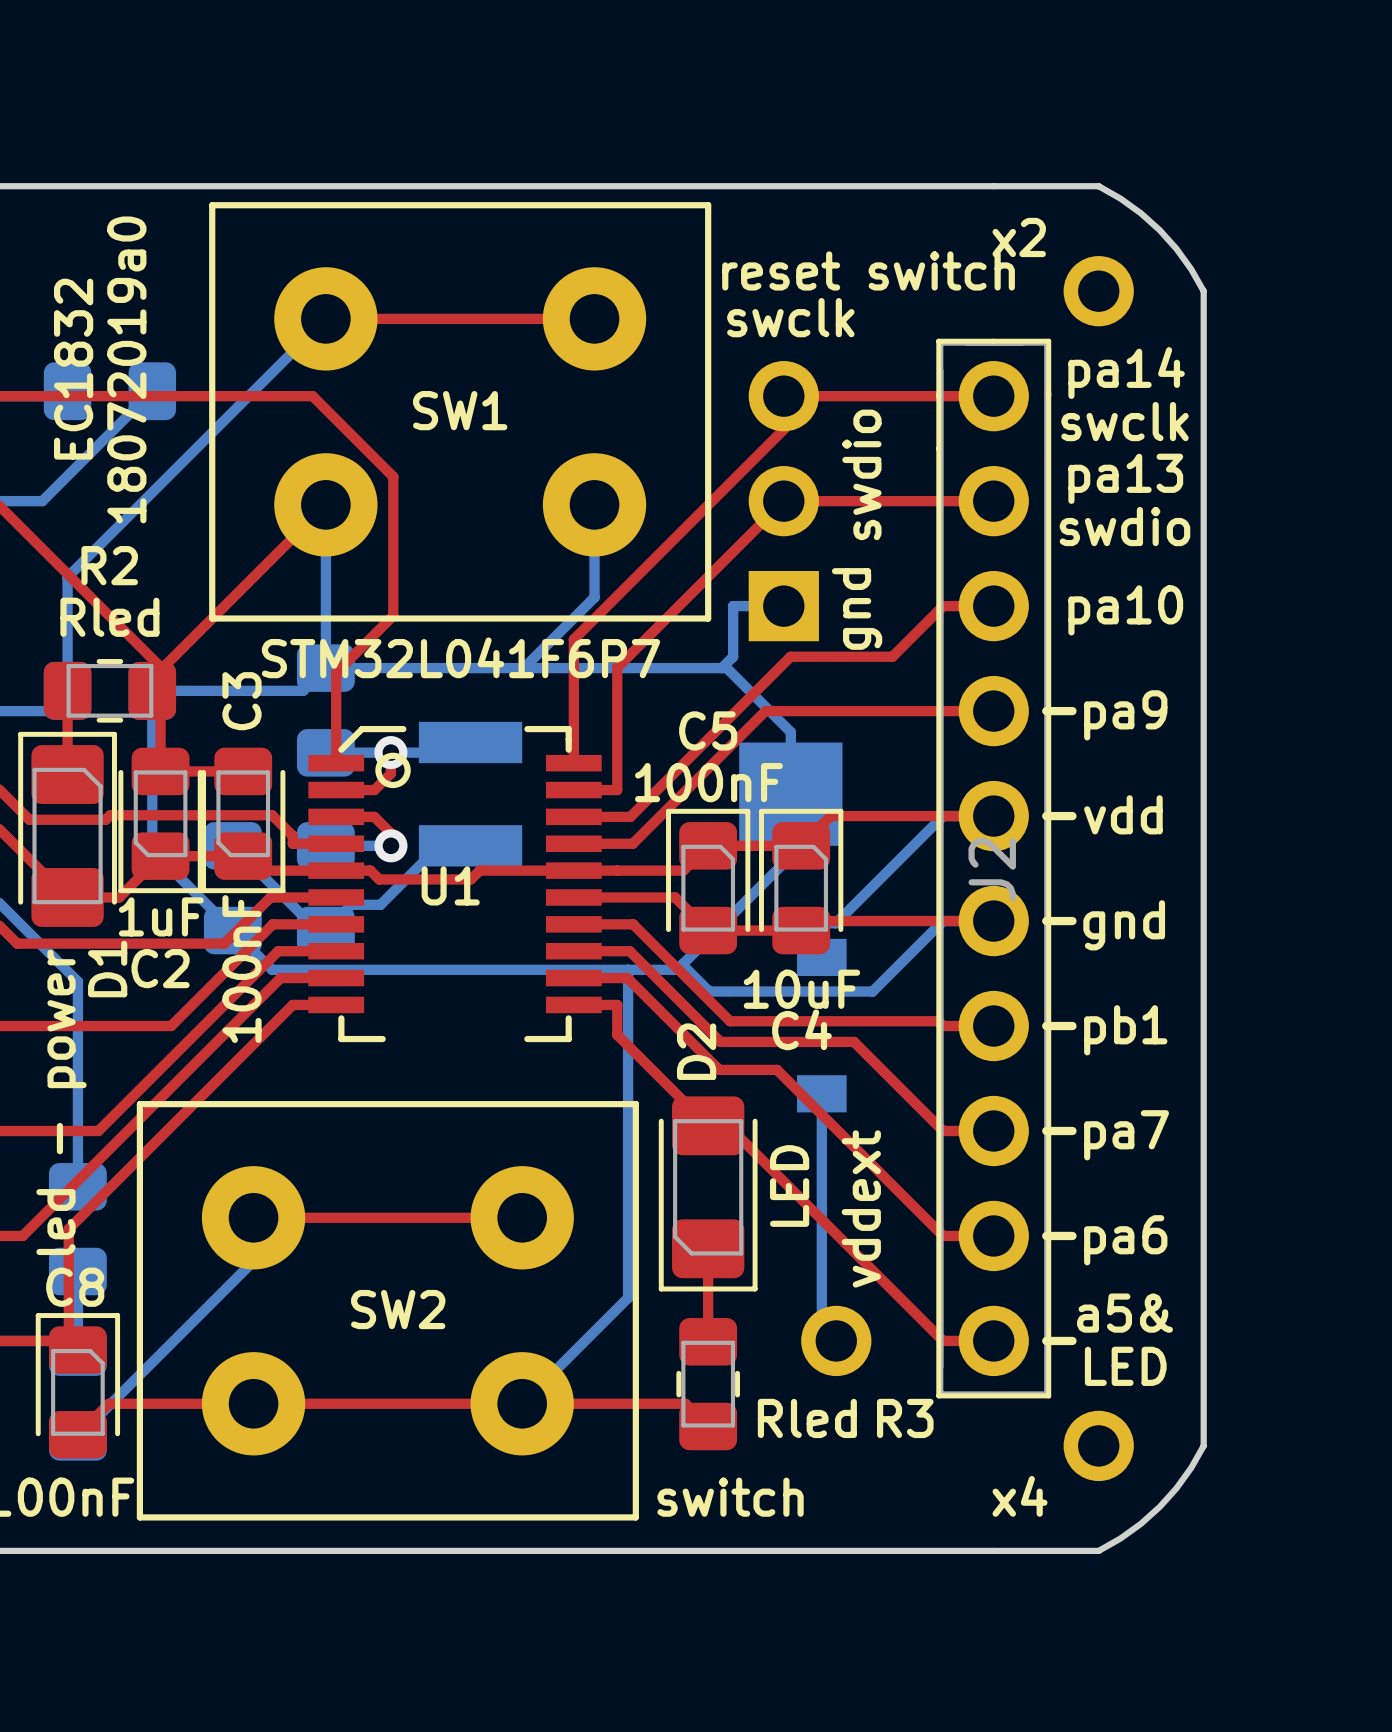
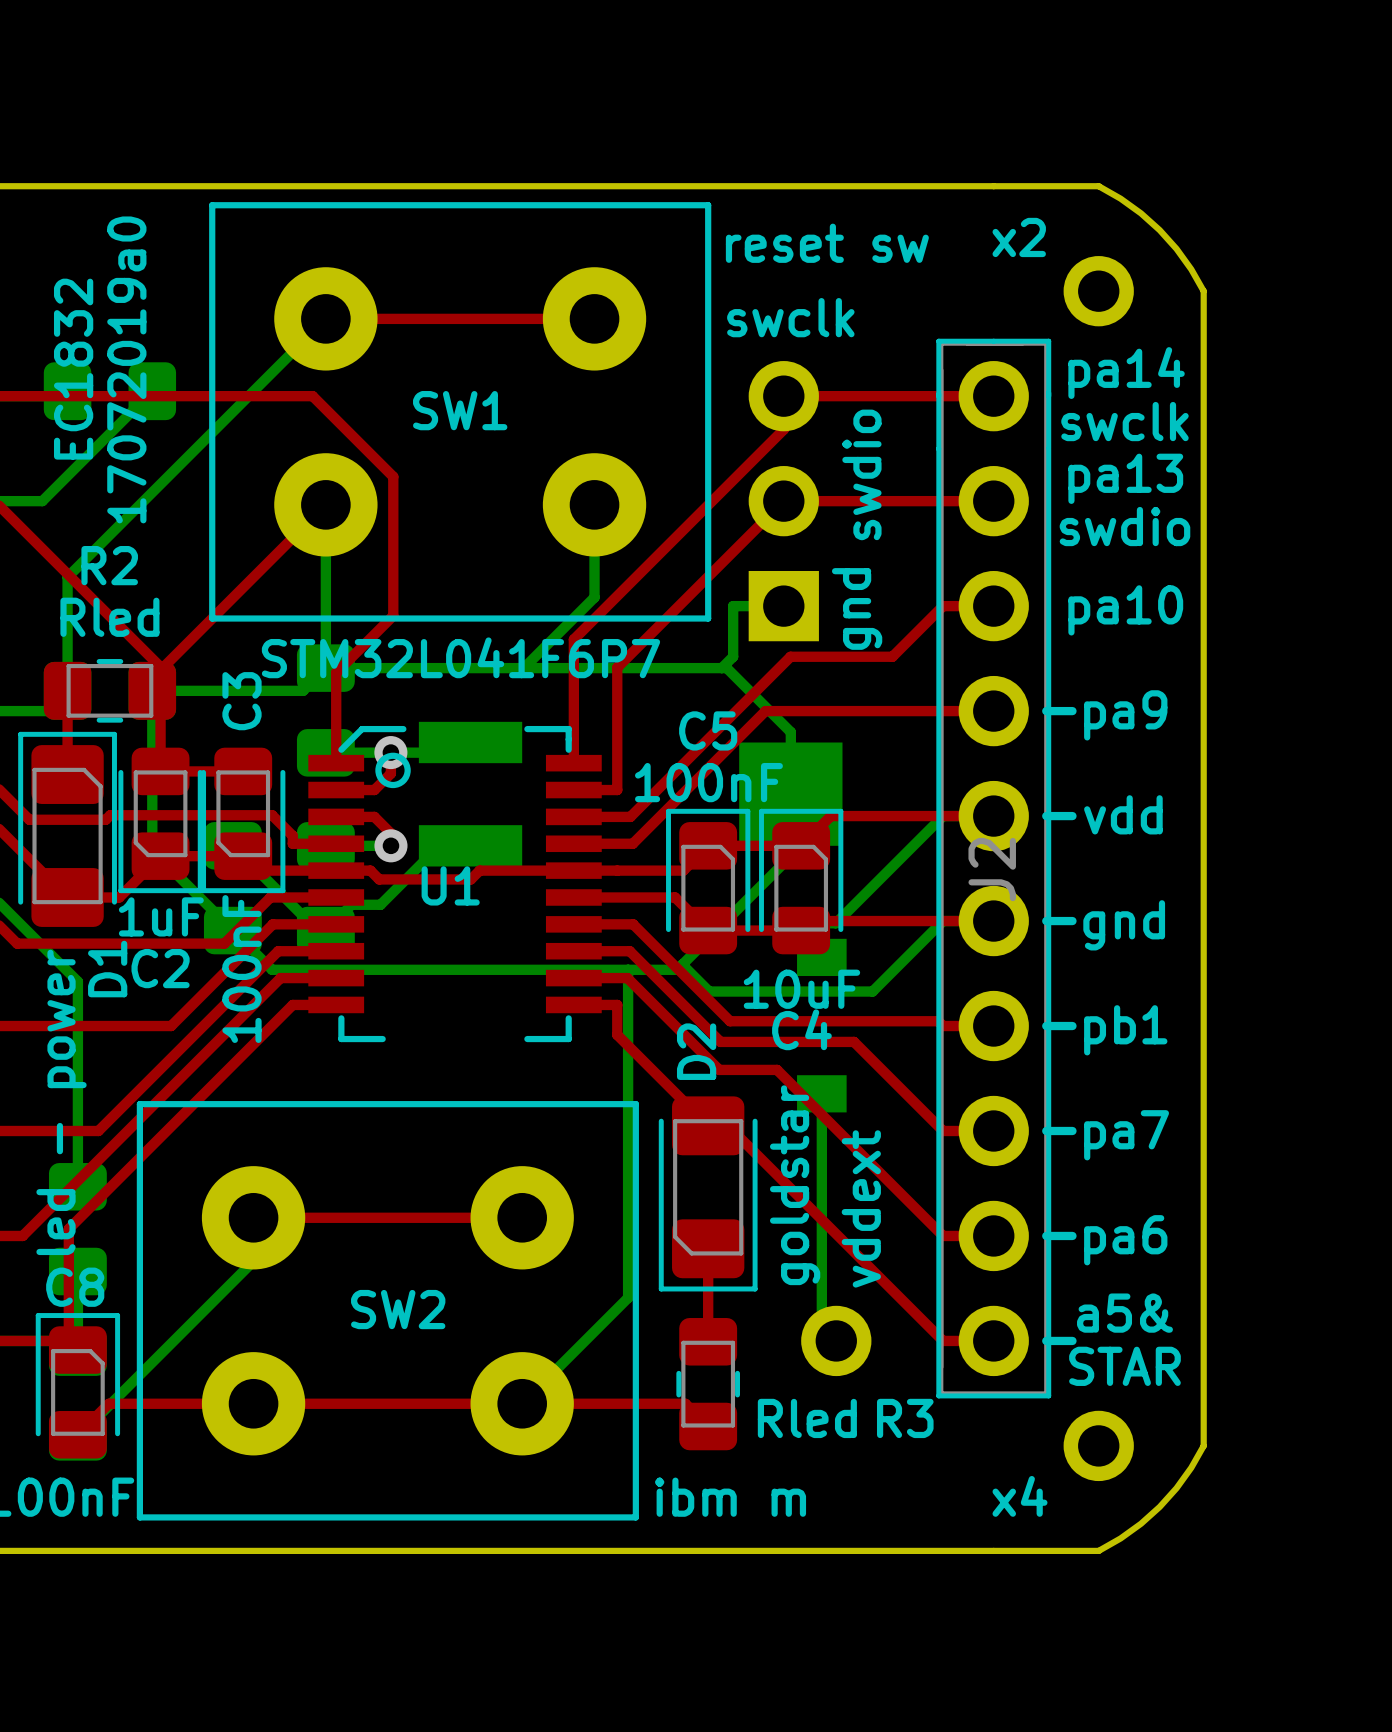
SW1 value: reset switch (868, 270) -> reset sw (827, 243)
text: 18072019а0 (126, 369) -> 17072019а0 (126, 369)
D2 value: LED (789, 1186) -> goldstar (795, 1185)
text: LED (1125, 1366) -> STAR (1124, 1366)
SW2 value: switch (730, 1497) -> ibm m (730, 1497)

